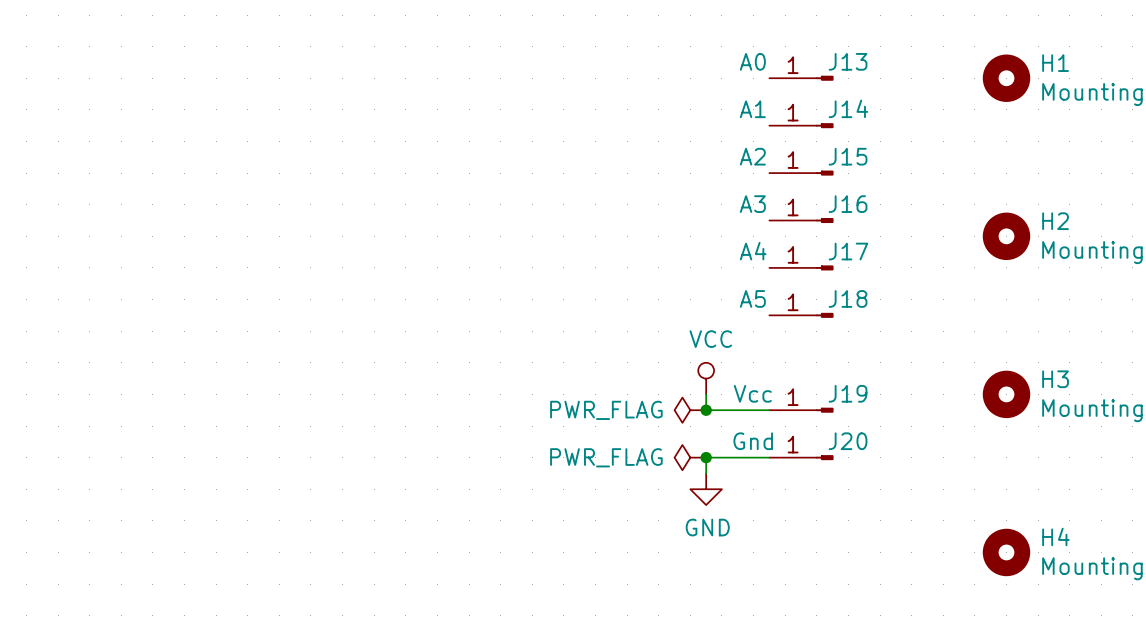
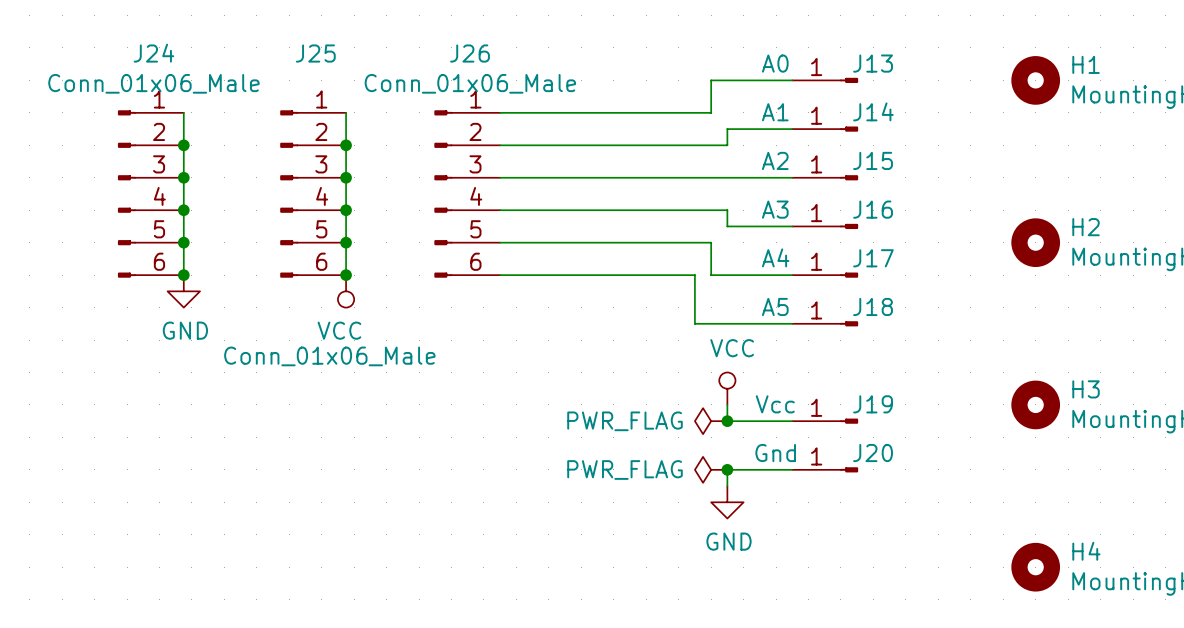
wire: none -> (792, 80) (711, 80) (711, 112) (500, 112)
wire: none -> (183, 112) (183, 275)
wire: none -> (346, 112) (346, 275)
wire: none -> (792, 129) (727, 129) (727, 145) (500, 145)
junction: none -> (183, 145)
junction: none -> (346, 145)
junction: none -> (183, 177)
junction: none -> (346, 177)
wire: none -> (500, 177) (792, 177)
J24: none -> Conn_01x06_Male (150, 193)
J25: none -> Conn_01x06_Male (313, 193)
J26: none -> Conn_01x06_Male (467, 193)
junction: none -> (183, 210)
junction: none -> (346, 210)
wire: none -> (500, 210) (727, 210) (727, 226) (792, 226)
junction: none -> (183, 242)
junction: none -> (346, 242)
wire: none -> (500, 242) (711, 242) (711, 275) (792, 275)
junction: none -> (183, 275)
junction: none -> (346, 275)
wire: none -> (500, 275) (694, 275) (694, 323) (792, 323)
power symbol: none -> GND (183, 291)
power symbol: none -> VCC (346, 291)

